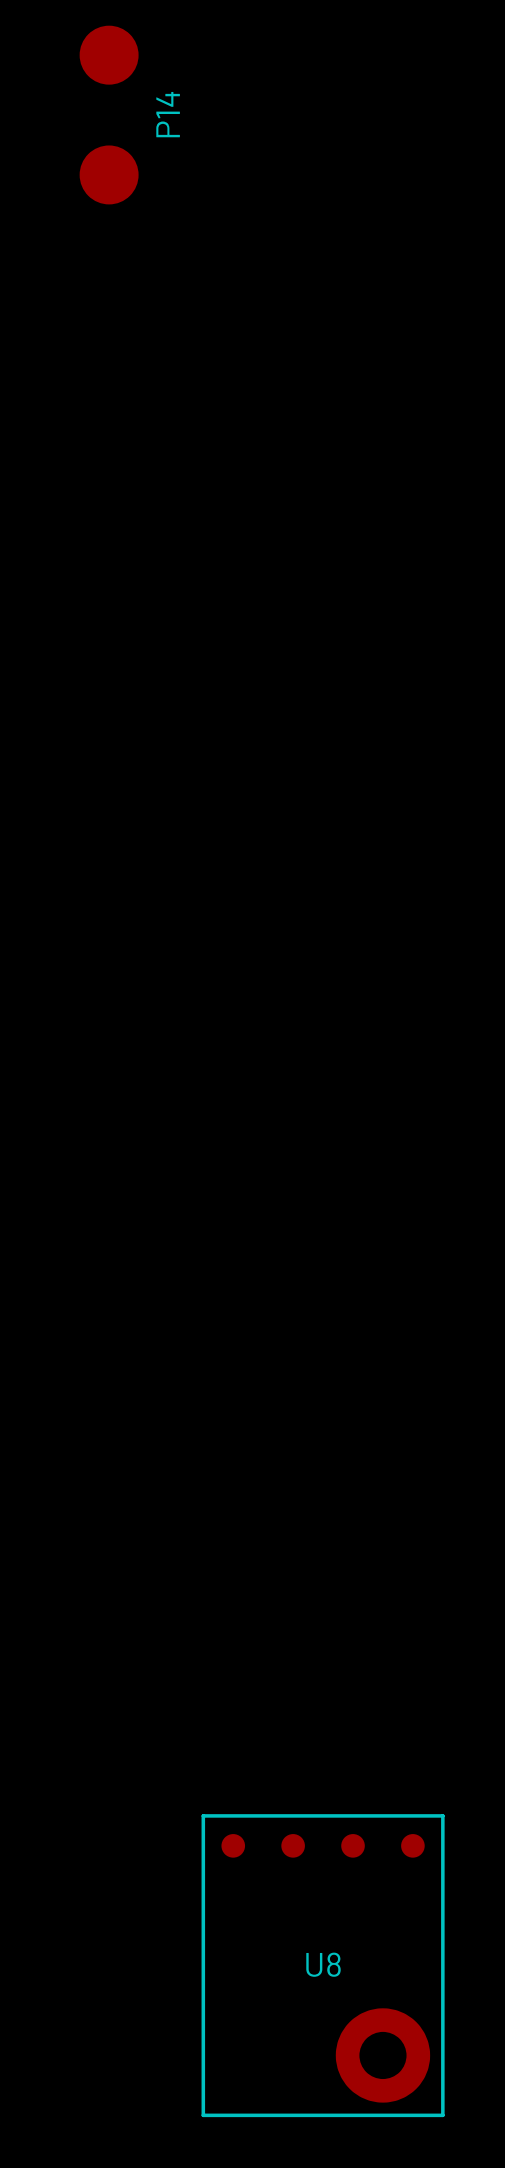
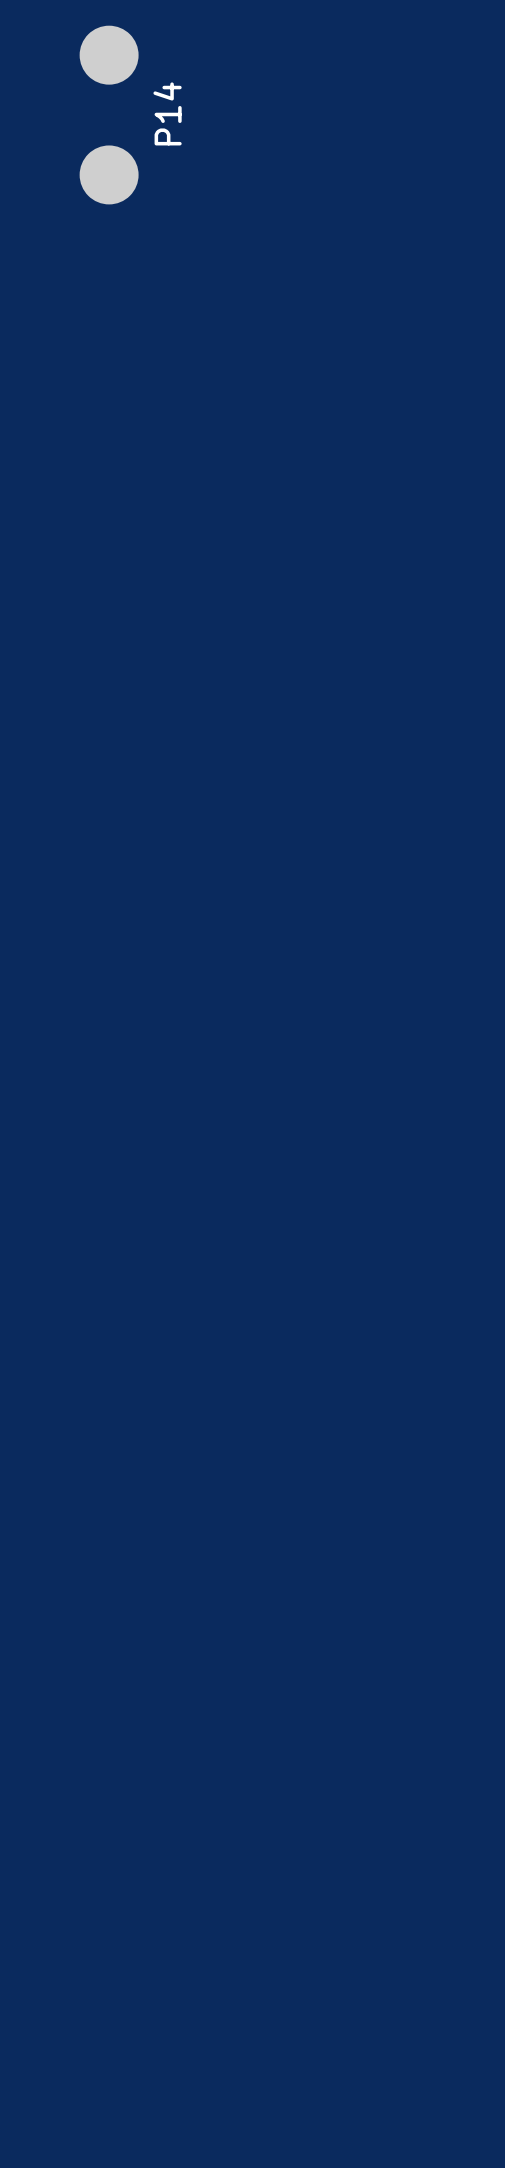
U8: (323, 1965) -> none

